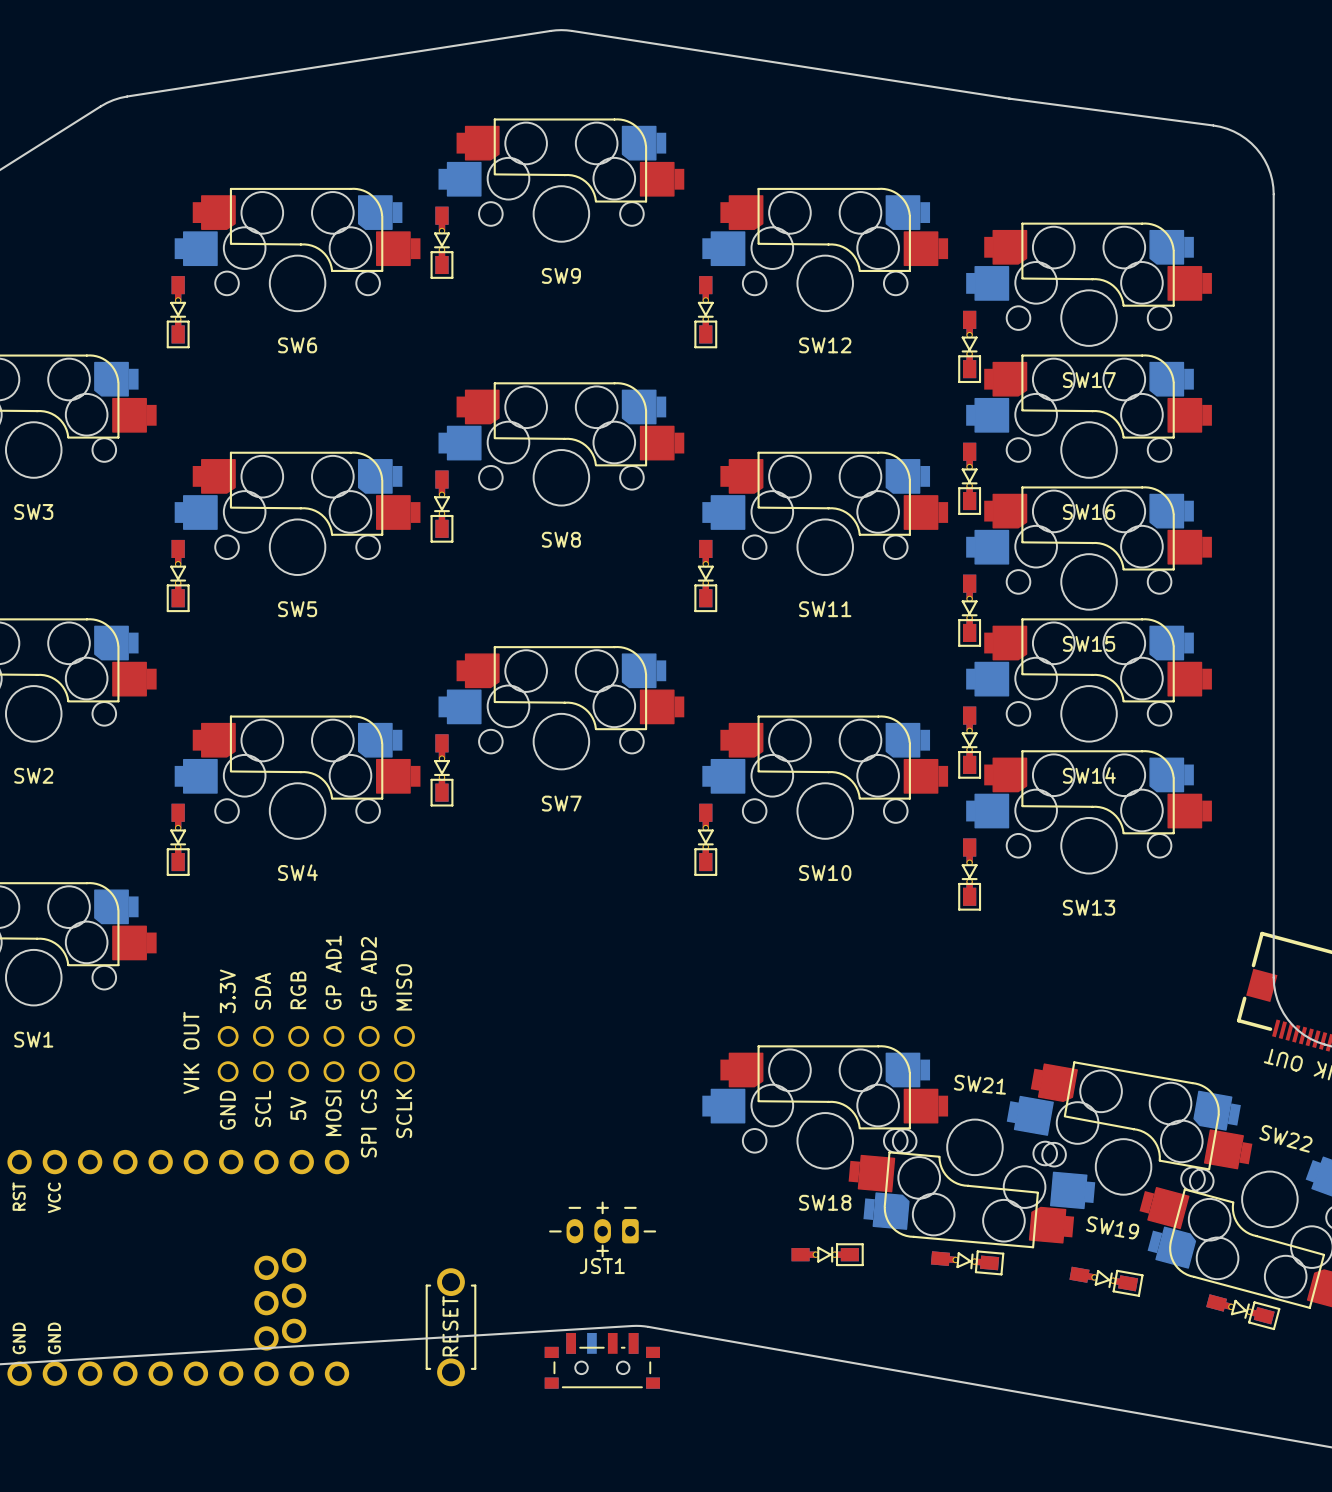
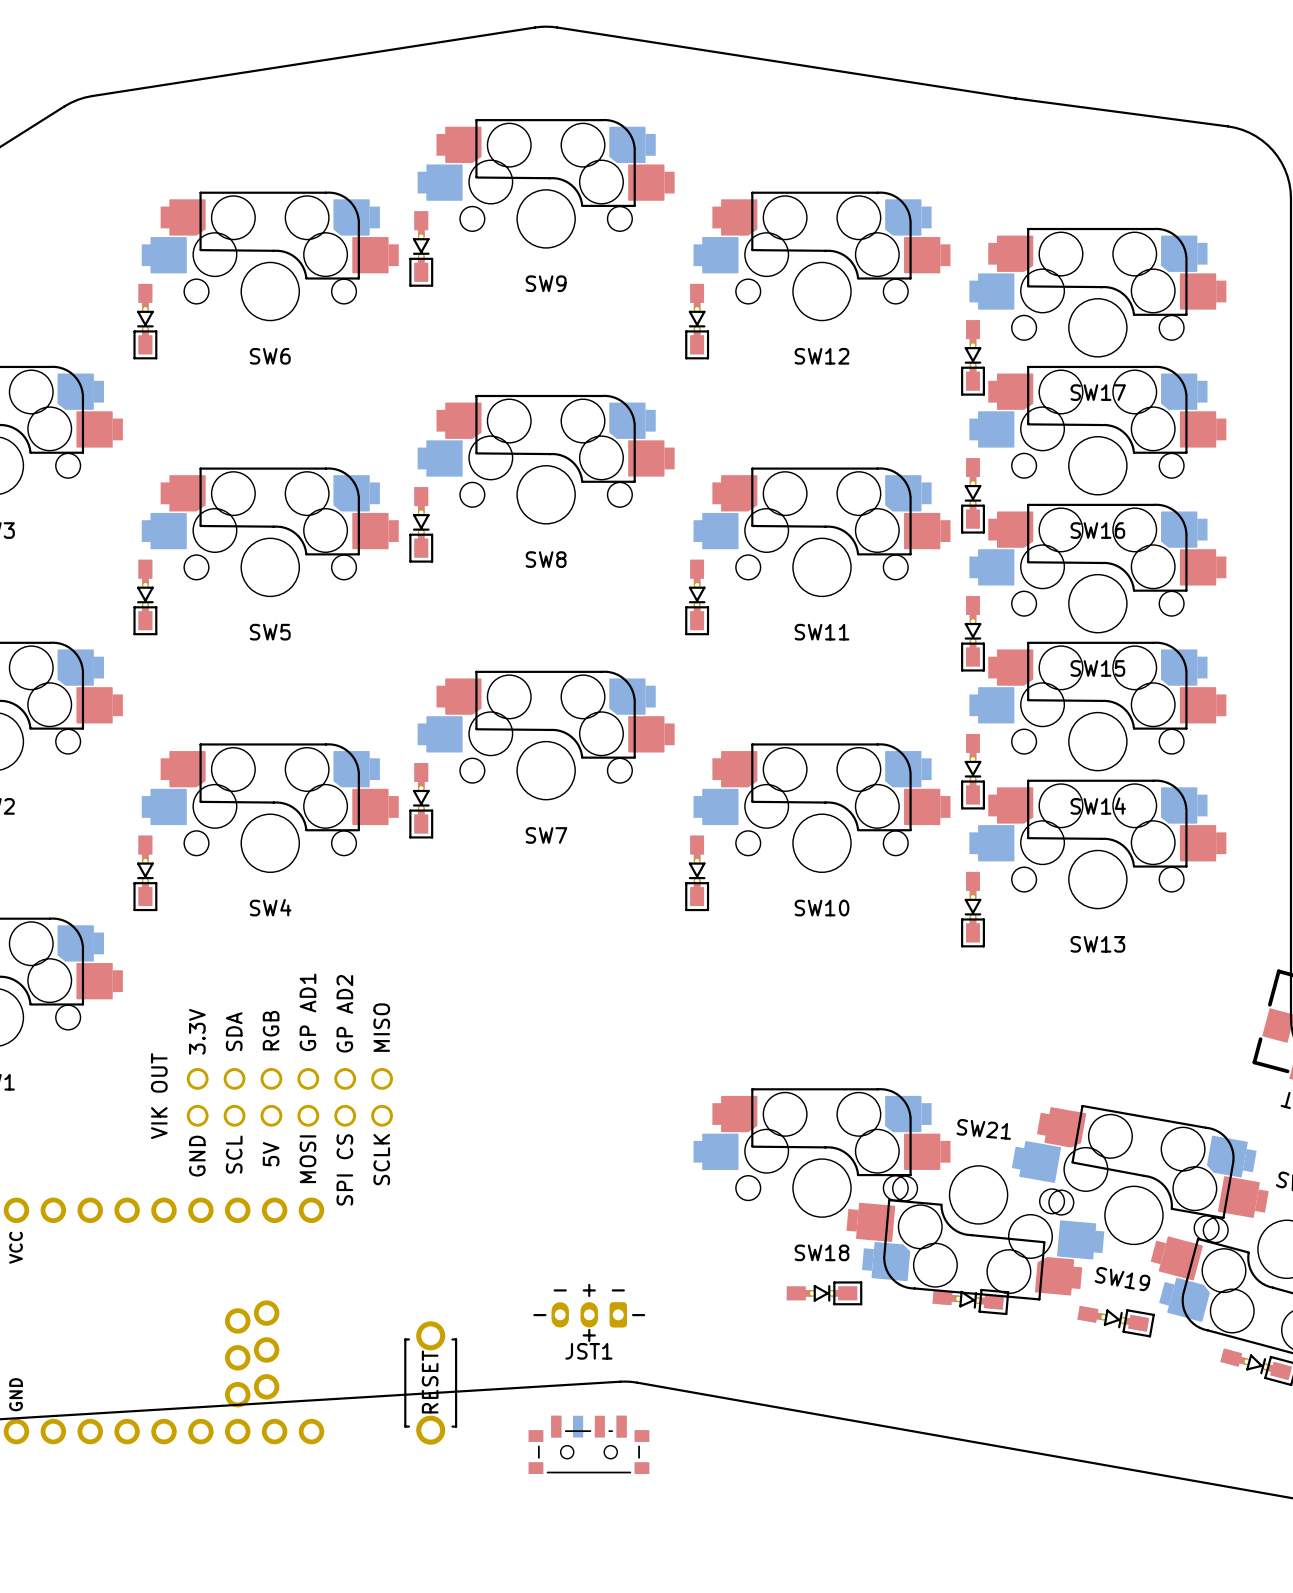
JST1 position: (602, 1231) -> (589, 1314)
part position: (827, 1254) -> (824, 1293)
part position: (967, 1262) -> (970, 1301)
part position: (1106, 1281) -> (1116, 1321)
part position: (602, 1360) -> (588, 1444)

